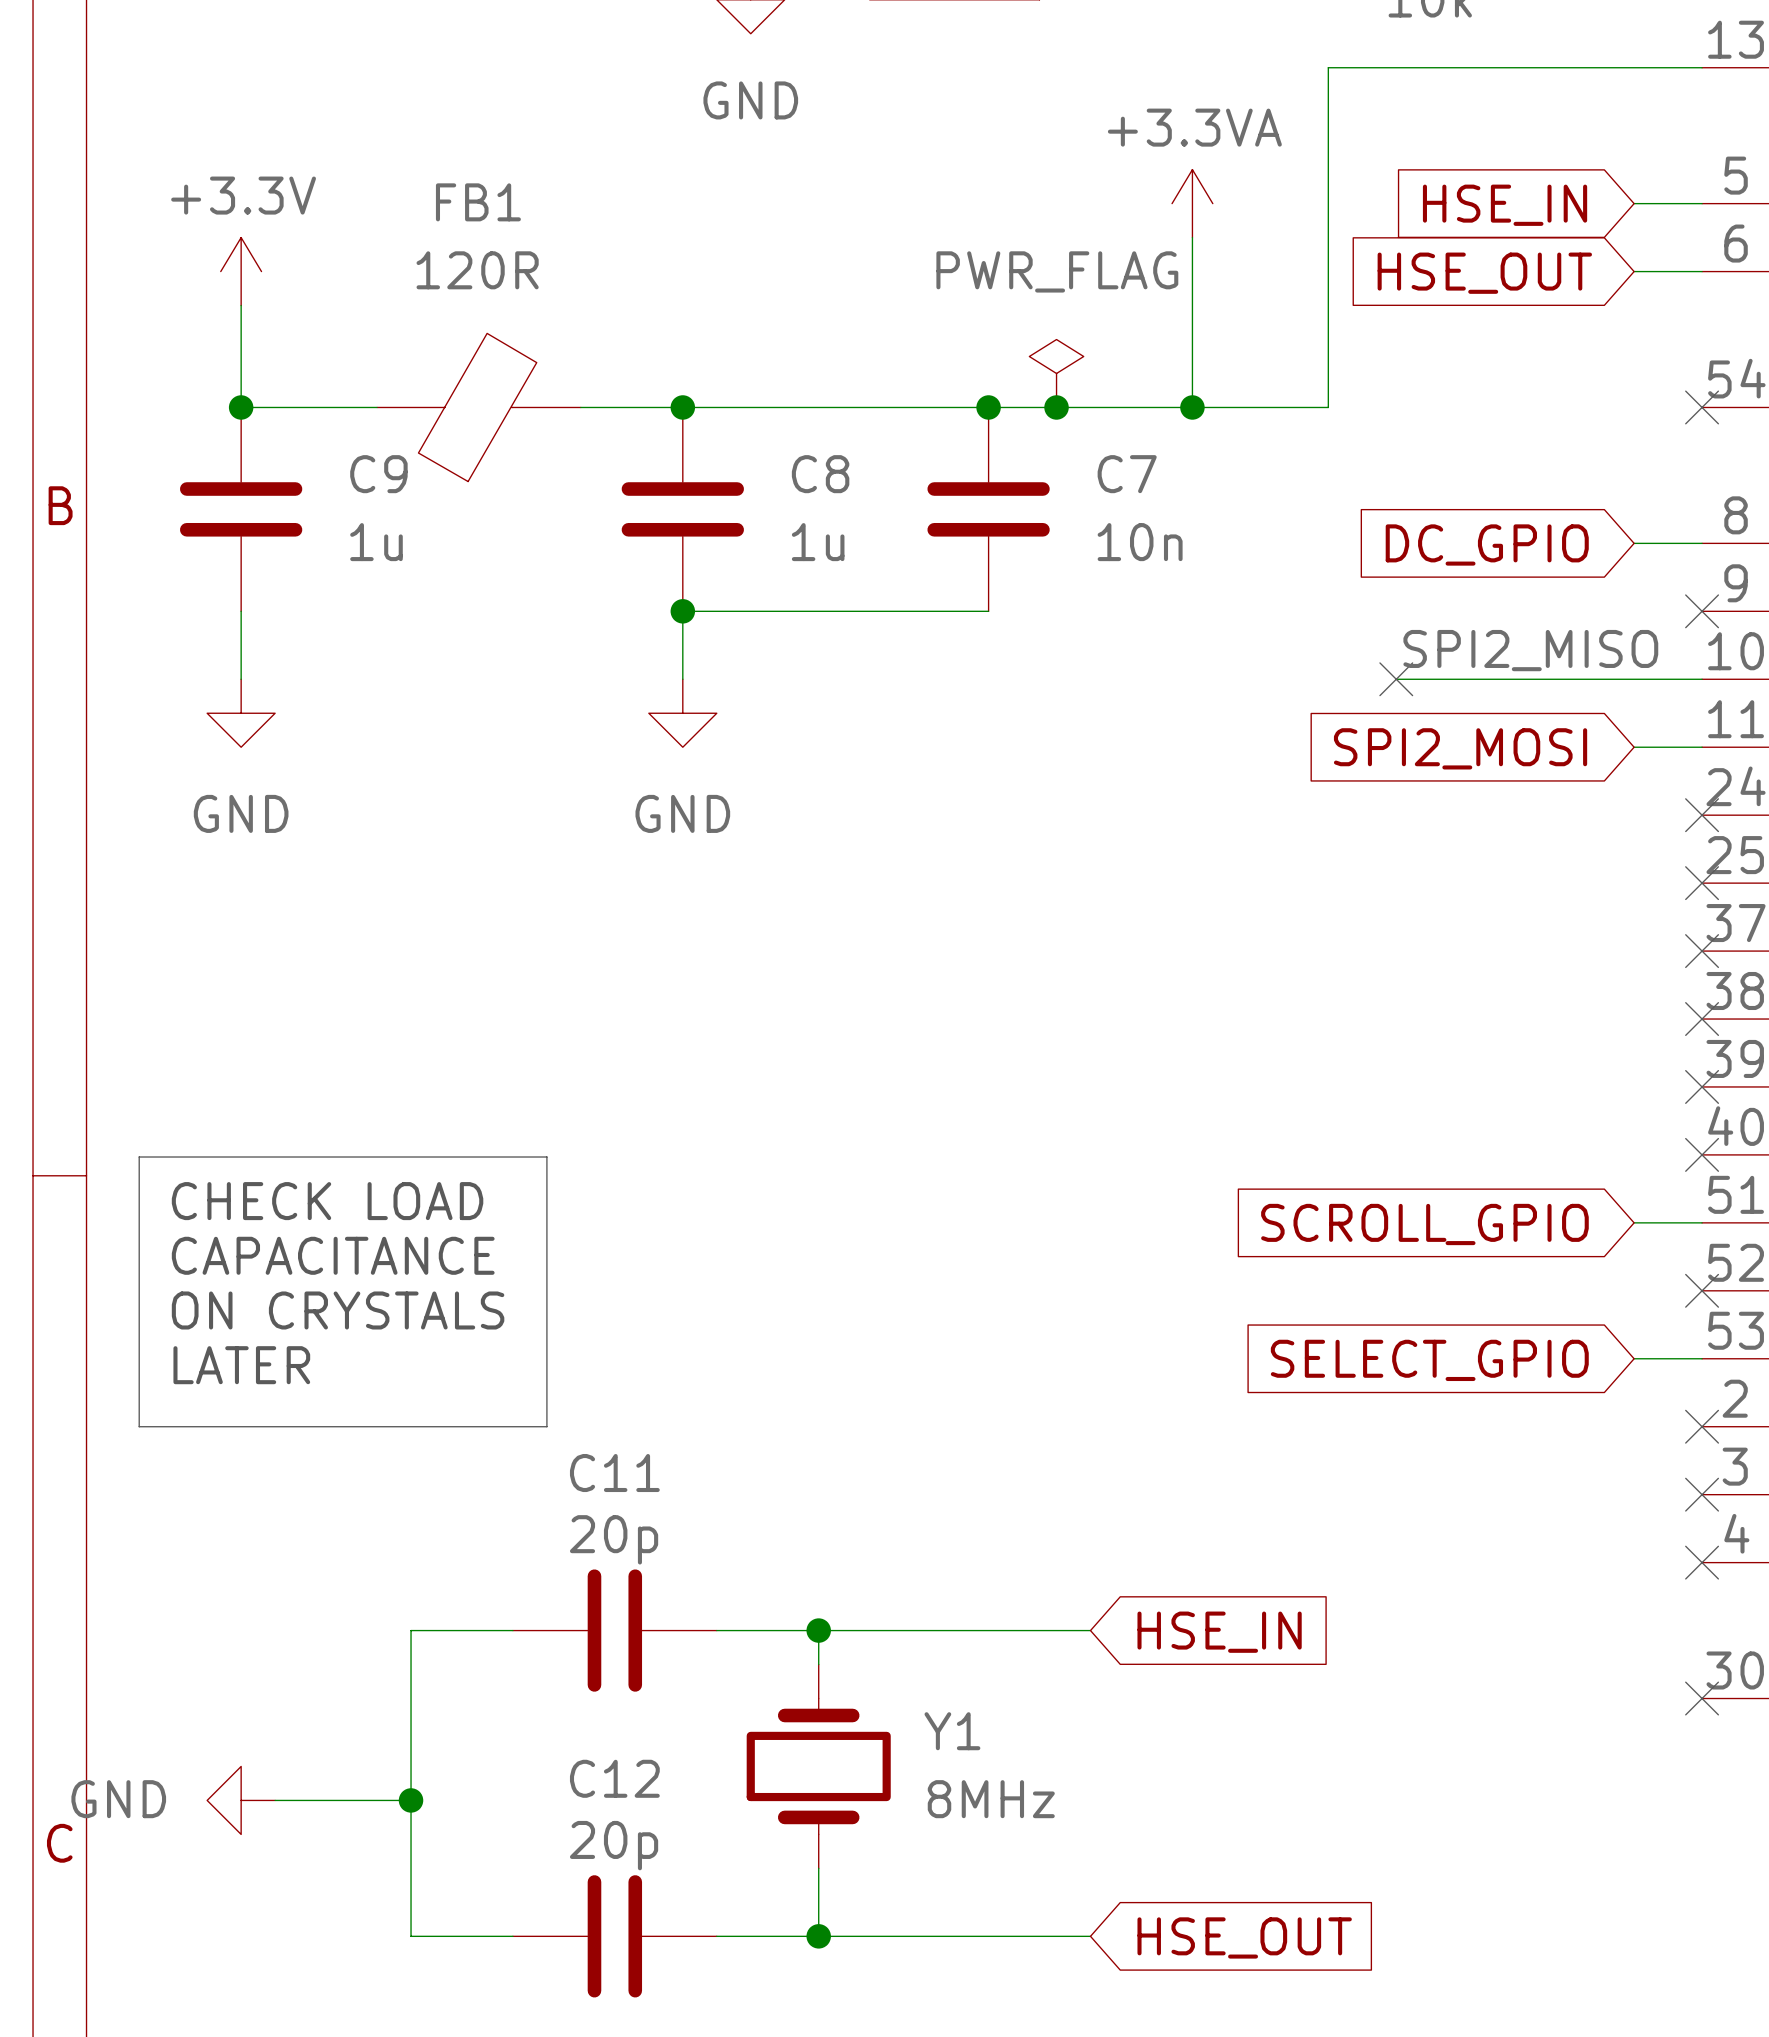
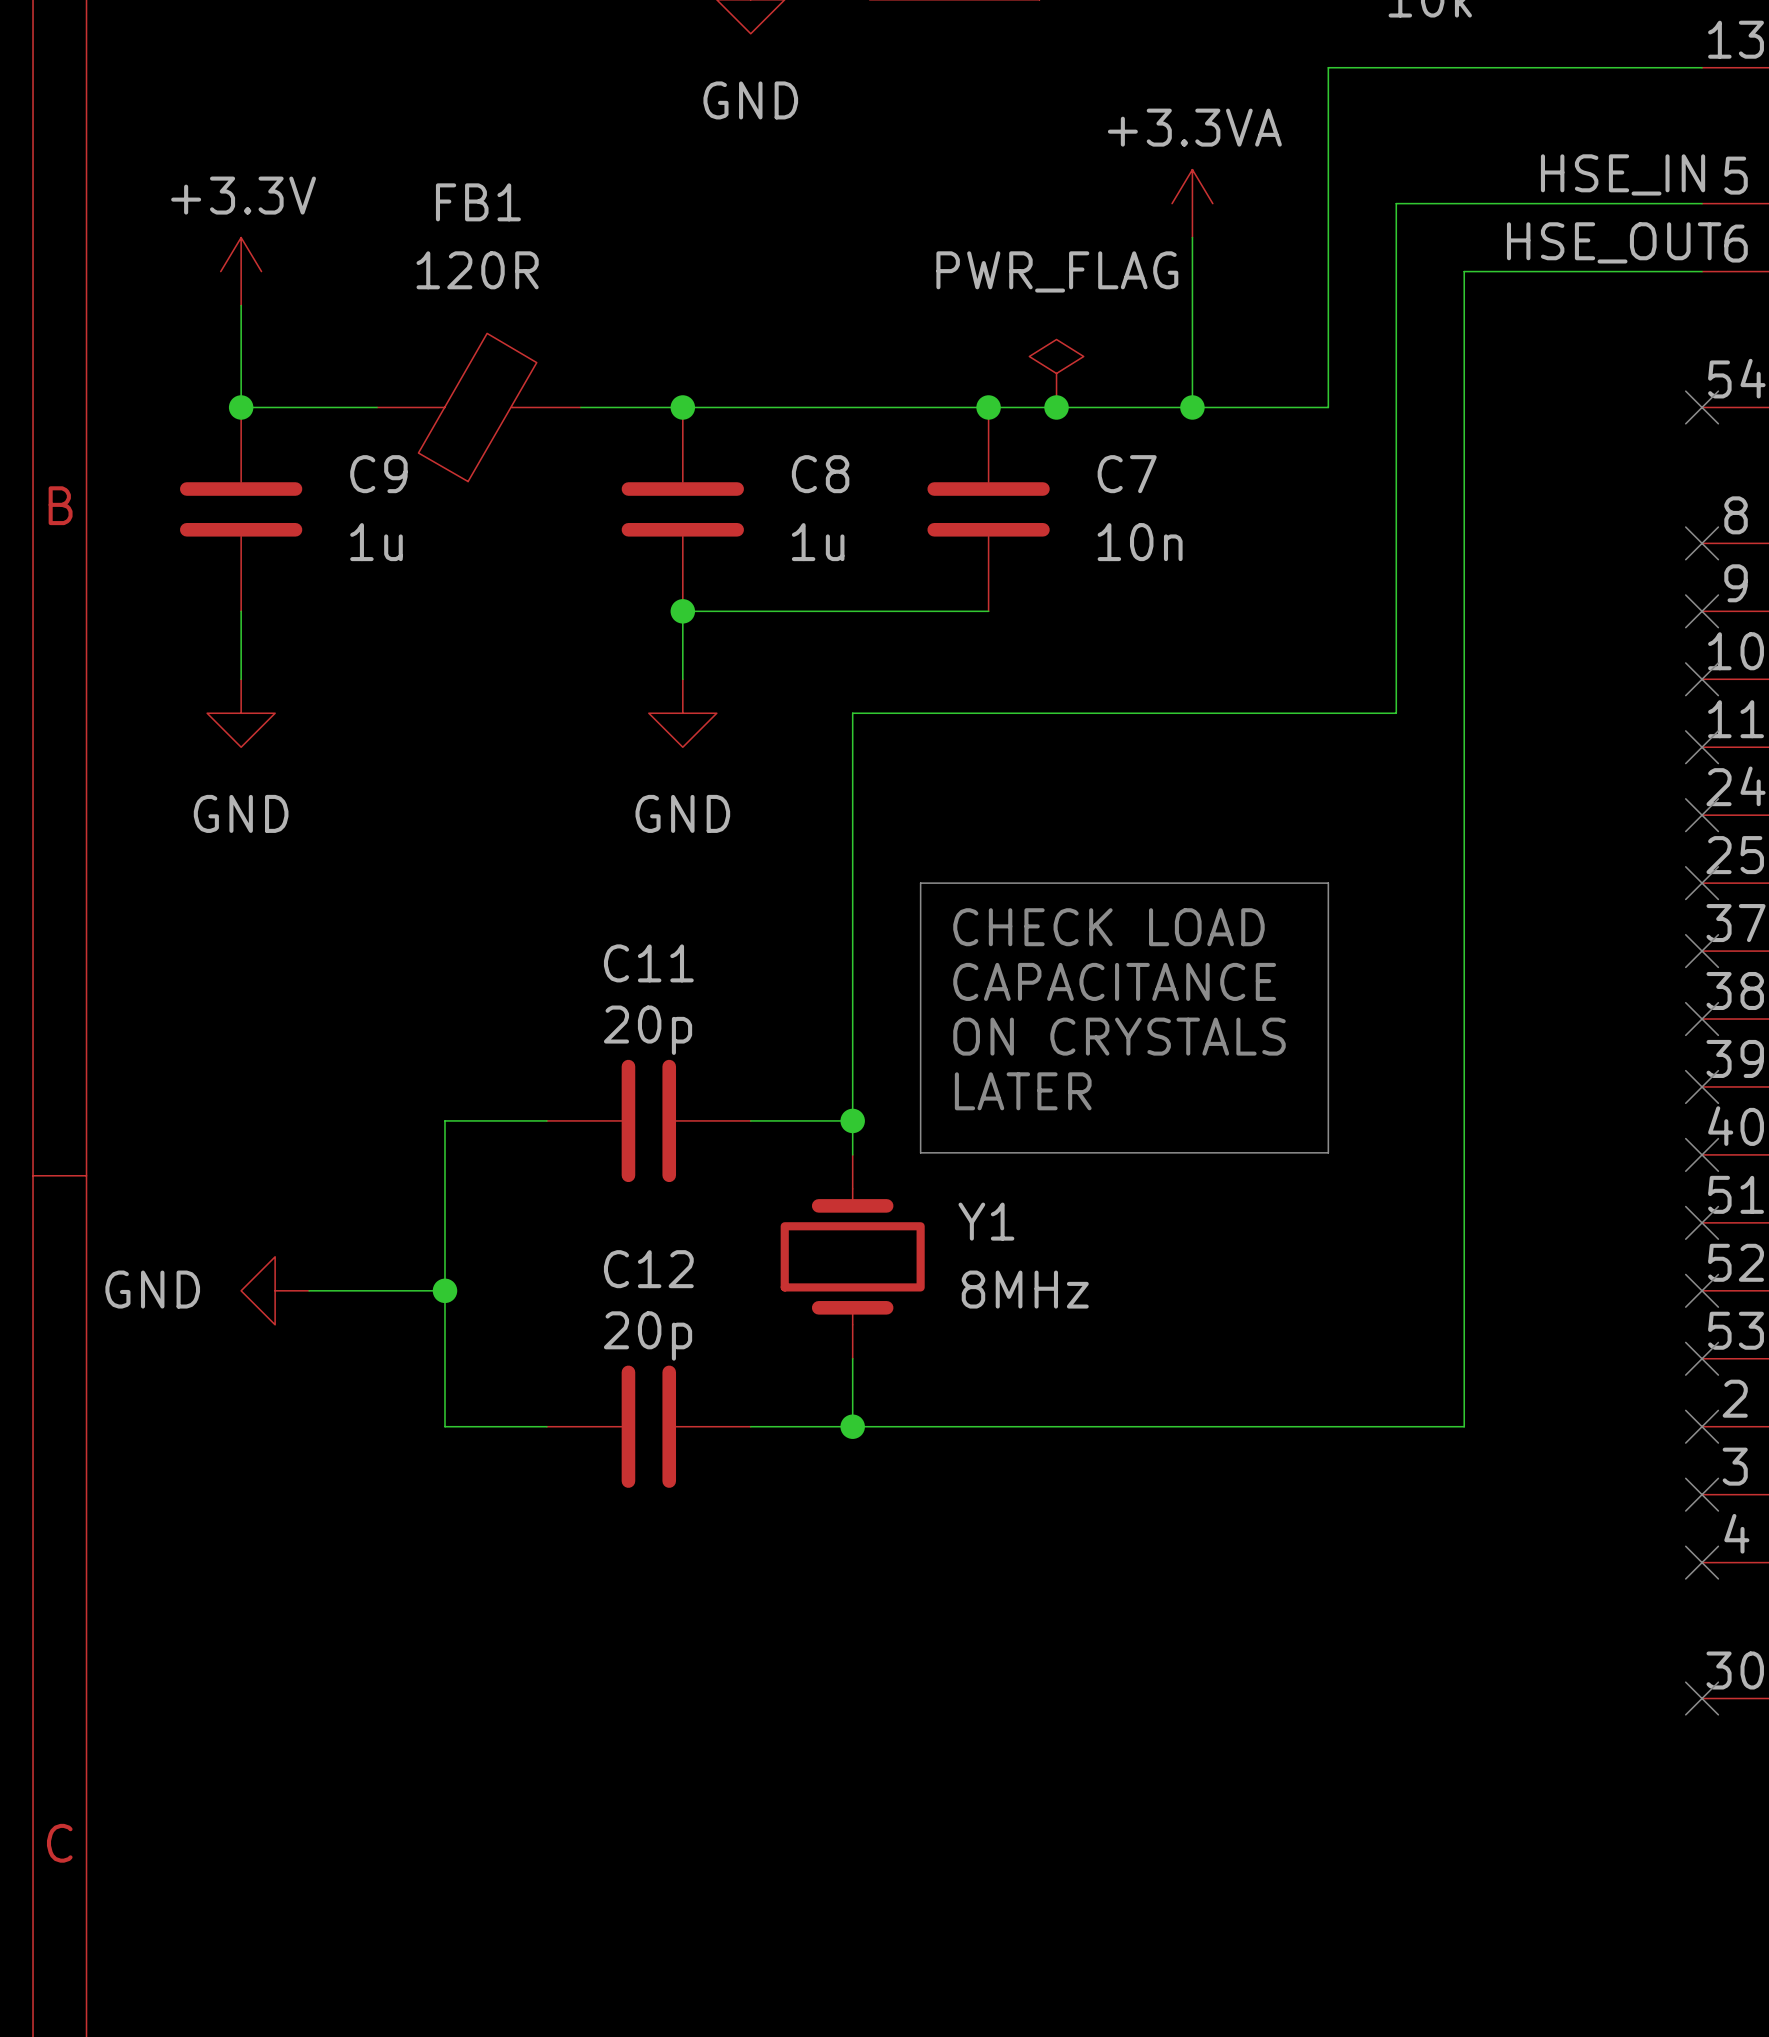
label: none -> HSE_IN (1623, 174)
wire: none -> (1634, 203) (1396, 203) (1396, 713) (852, 713) (852, 1154)
global label: HSE_IN (1505, 205) -> none
label: none -> HSE_OUT (1614, 242)
wire: none -> (1634, 271) (1464, 271) (1464, 1426) (750, 1426)
global label: HSE_OUT (1484, 273) -> none
wire: (1634, 543) (1702, 543) -> none
no-connect mark: none -> (1702, 543)
global label: DC_GPIO (1487, 544) -> none
label: SPI2_MISO (1530, 650) -> none
wire: (1396, 679) (1702, 679) -> none
no-connect mark: (1396, 679) -> none
no-connect mark: none -> (1702, 679)
wire: (1634, 747) (1702, 747) -> none
no-connect mark: none -> (1702, 747)
global label: SPI2_MOSI (1460, 748) -> none
line: none -> (920, 883) (1328, 883) (1328, 1152) (920, 1152) (920, 883)
text: none -> CHECK LOAD (1108, 927)
text: none -> CAPACITANCE (1114, 981)
text: none -> ON CRYSTALS (1119, 1036)
text: none -> LATER (1023, 1091)
wire: none -> (750, 1120) (852, 1120)
junction: none -> (852, 1120)
line: (139, 1157) (546, 1157) (546, 1426) (139, 1426) (139, 1157) -> none
text: CHECK LOAD (327, 1201) -> none
wire: (1634, 1222) (1702, 1222) -> none
no-connect mark: none -> (1702, 1222)
global label: SCROLL_GPIO (1424, 1224) -> none
text: CAPACITANCE (333, 1255) -> none
junction: none -> (444, 1290)
text: ON CRYSTALS (338, 1310) -> none
wire: (1634, 1358) (1702, 1358) -> none
no-connect mark: none -> (1702, 1358)
global label: SELECT_GPIO (1429, 1360) -> none
text: LATER (241, 1365) -> none
junction: none -> (852, 1426)
wire: (512, 1630) (411, 1630) (411, 1936) (512, 1936) -> (546, 1120) (444, 1120) (444, 1426) (546, 1426)
C11 position: (614, 1630) -> (648, 1120)
wire: (716, 1630) (1090, 1630) -> none
wire: (818, 1630) (818, 1664) -> none
junction: (818, 1630) -> none
global label: HSE_IN (1219, 1632) -> none
Y1 position: (818, 1766) -> (852, 1256)
power symbol position: GND (241, 1800) -> GND (275, 1290)
wire: (275, 1800) (411, 1800) -> (309, 1290) (444, 1290)
junction: (411, 1800) -> none
wire: (818, 1868) (818, 1936) -> (852, 1358) (852, 1426)
C12 position: (614, 1936) -> (648, 1426)
wire: (716, 1936) (1090, 1936) -> none
junction: (818, 1936) -> none
global label: HSE_OUT (1244, 1937) -> none

